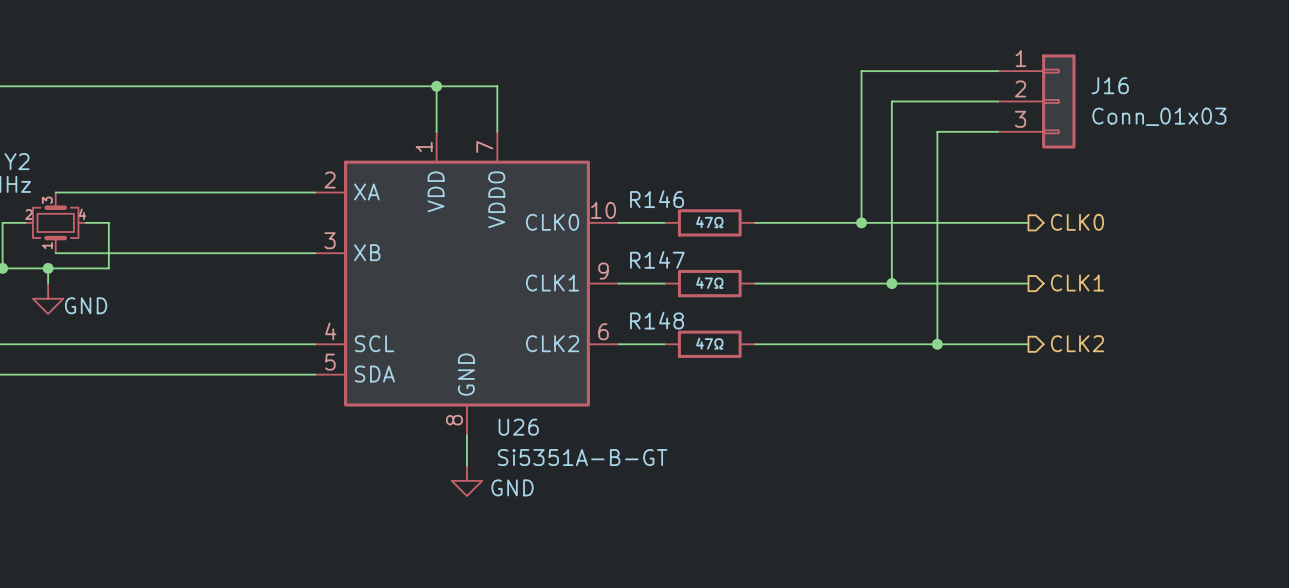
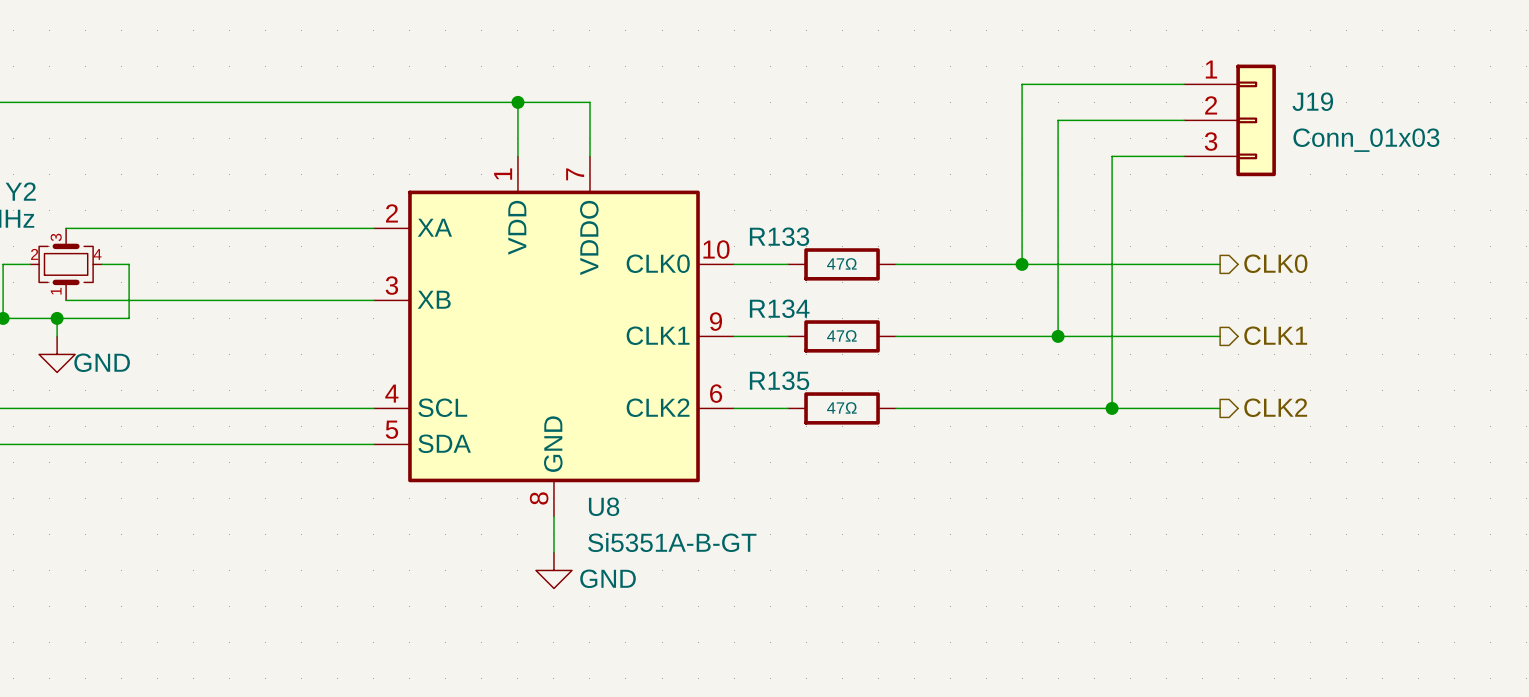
J16 name: J16 (1110, 85) -> J19 (1312, 101)
R146 name: R146 (657, 199) -> R133 (779, 236)
R147 name: R147 (657, 259) -> R134 (779, 308)
R148 name: R148 (657, 320) -> R135 (779, 380)
U26 name: U26 (518, 427) -> U8 (604, 506)

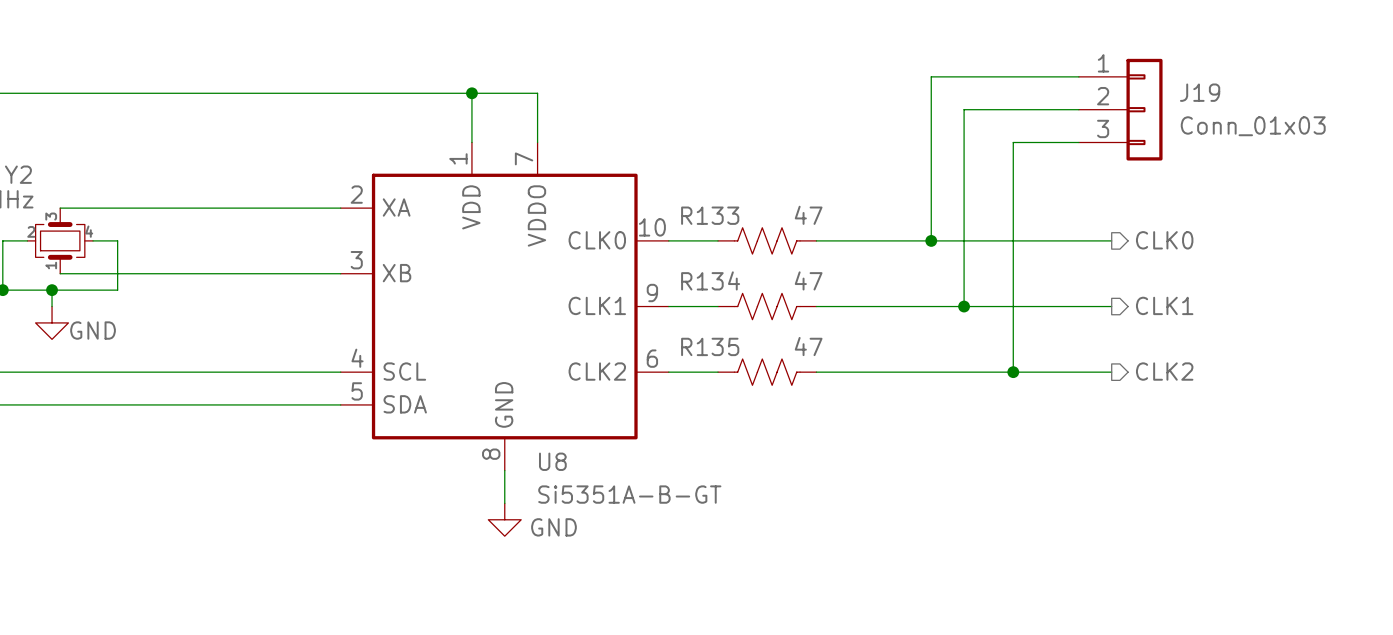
R133 symbol: [788, 248, 897, 281] -> [718, 227, 817, 255]
R133 value: 47Ω (841, 263) -> 47 (808, 215)
R134 symbol: [788, 320, 897, 353] -> [718, 293, 817, 320]
R134 value: 47Ω (841, 335) -> 47 (808, 280)
R135 symbol: [788, 392, 897, 425] -> [718, 359, 817, 386]
R135 value: 47Ω (841, 407) -> 47 (808, 346)

